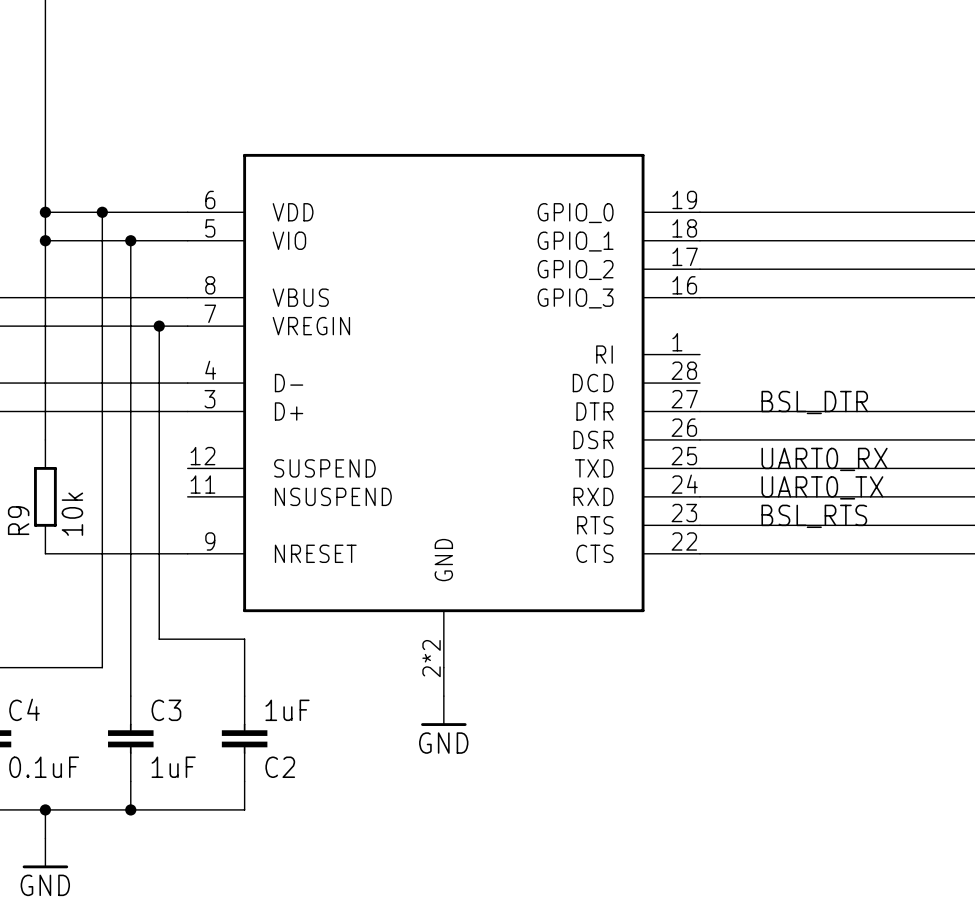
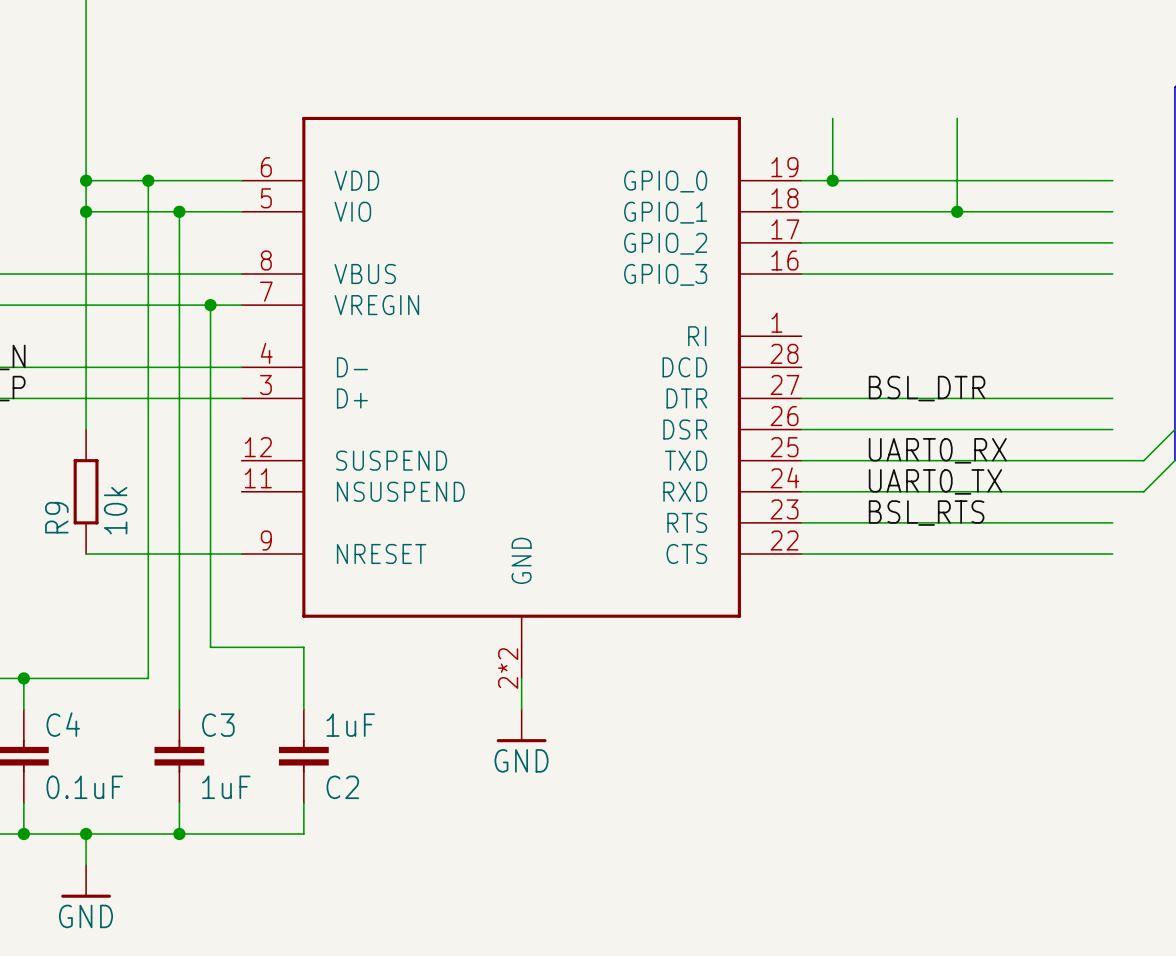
wire: none -> (832, 118) (832, 180)
wire: none -> (957, 118) (957, 211)
junction: none -> (832, 180)
junction: none -> (957, 211)

